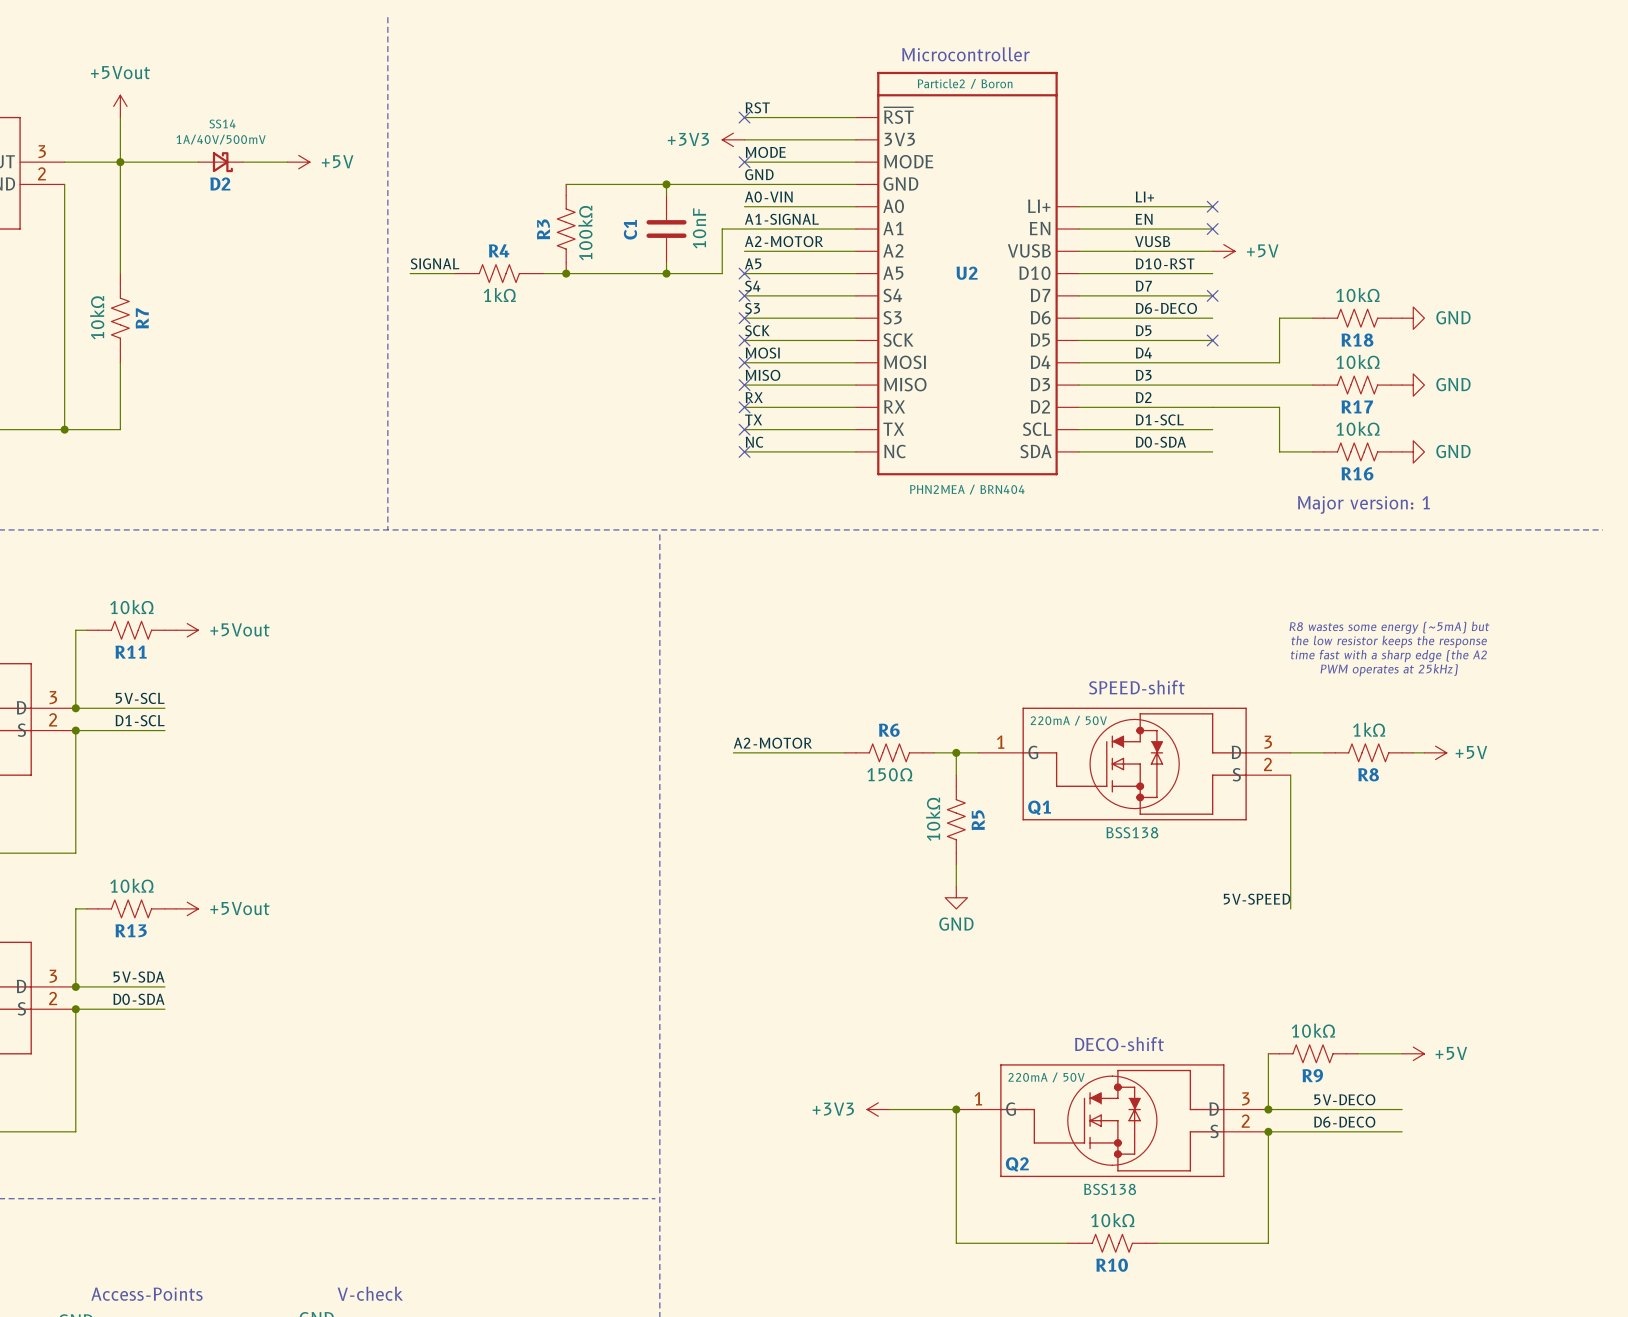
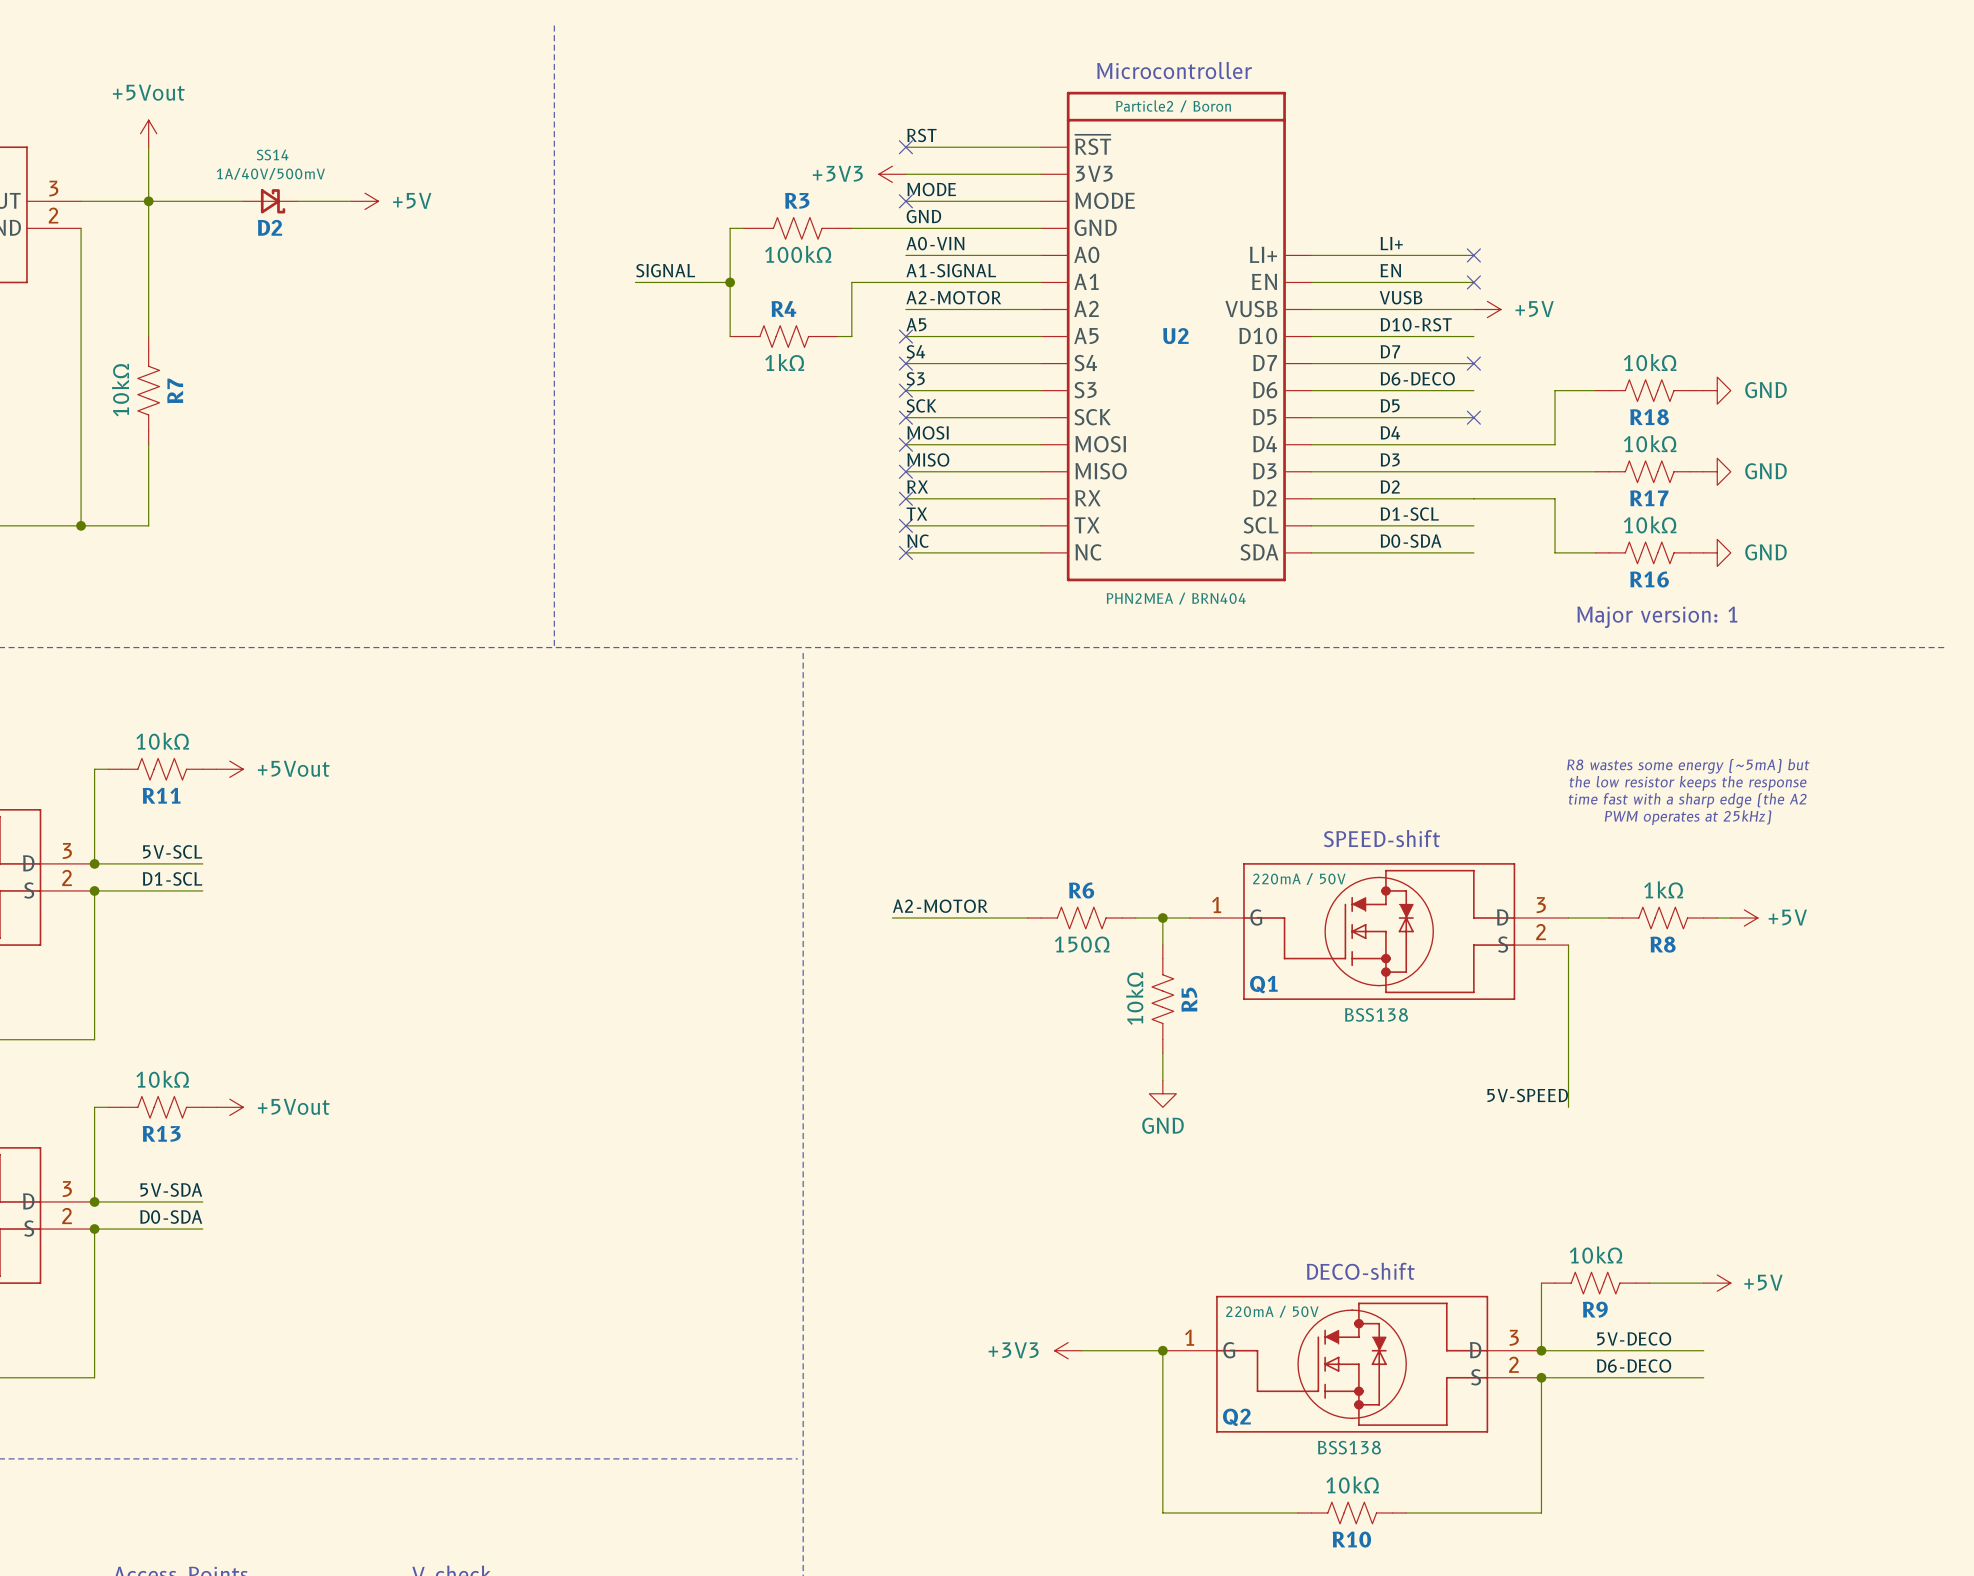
line: (387, 17) (387, 529) -> (554, 25) (554, 647)
wire: (566, 184) (599, 184) -> (730, 336) (730, 228)
wire: (666, 184) (666, 195) -> none
junction: (666, 184) -> none
wire: none -> (635, 282) (730, 282)
R3 rotation: 0° (566, 229) -> 90° clockwise (797, 228)
R3 position: (566, 229) -> (797, 228)
junction: none -> (730, 282)
C1: 10nF (666, 229) -> none
wire: (722, 229) (722, 273) (699, 273) -> (878, 282) (851, 282) (851, 336)
wire: (666, 262) (666, 273) -> none
label position: SIGNAL (435, 263) -> SIGNAL (665, 270)
wire: (410, 273) (454, 273) -> none
R4 position: (499, 273) -> (784, 336)
wire: (543, 273) (688, 273) -> none
junction: (566, 273) -> none
junction: (666, 273) -> none

